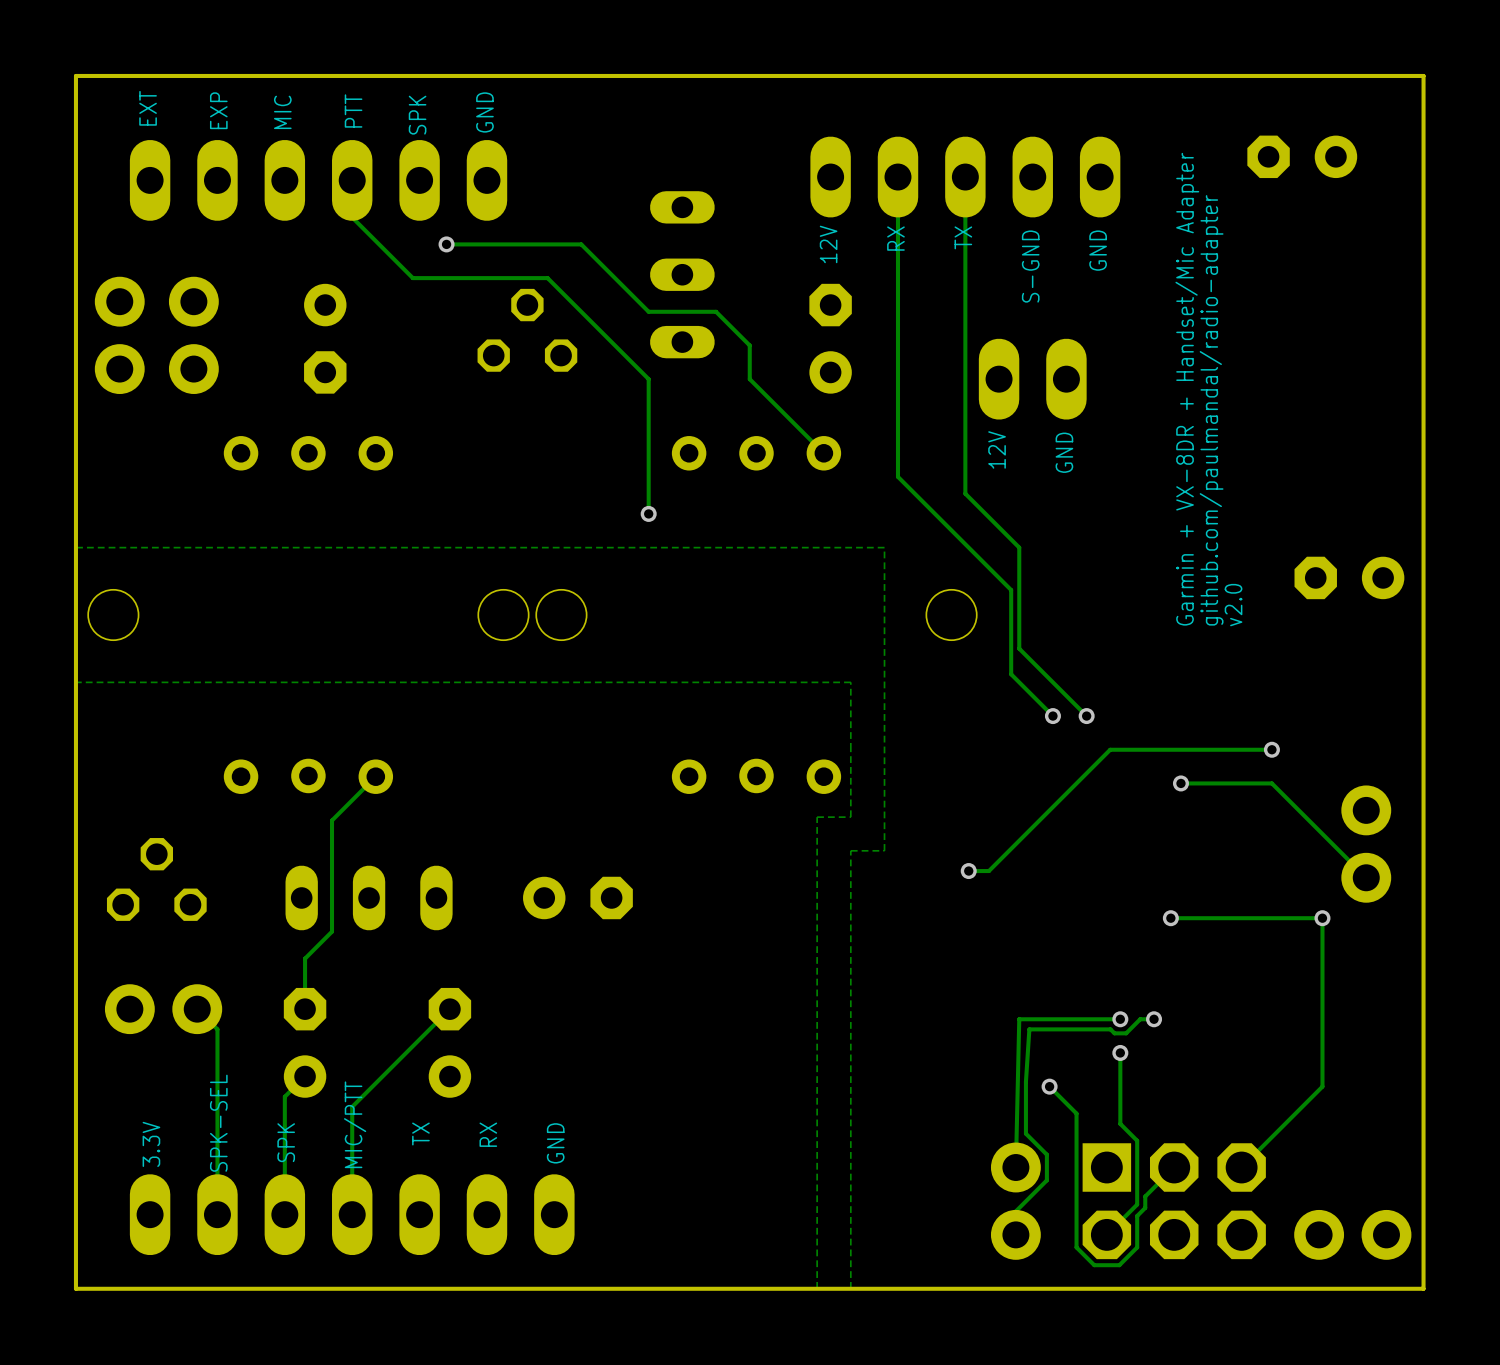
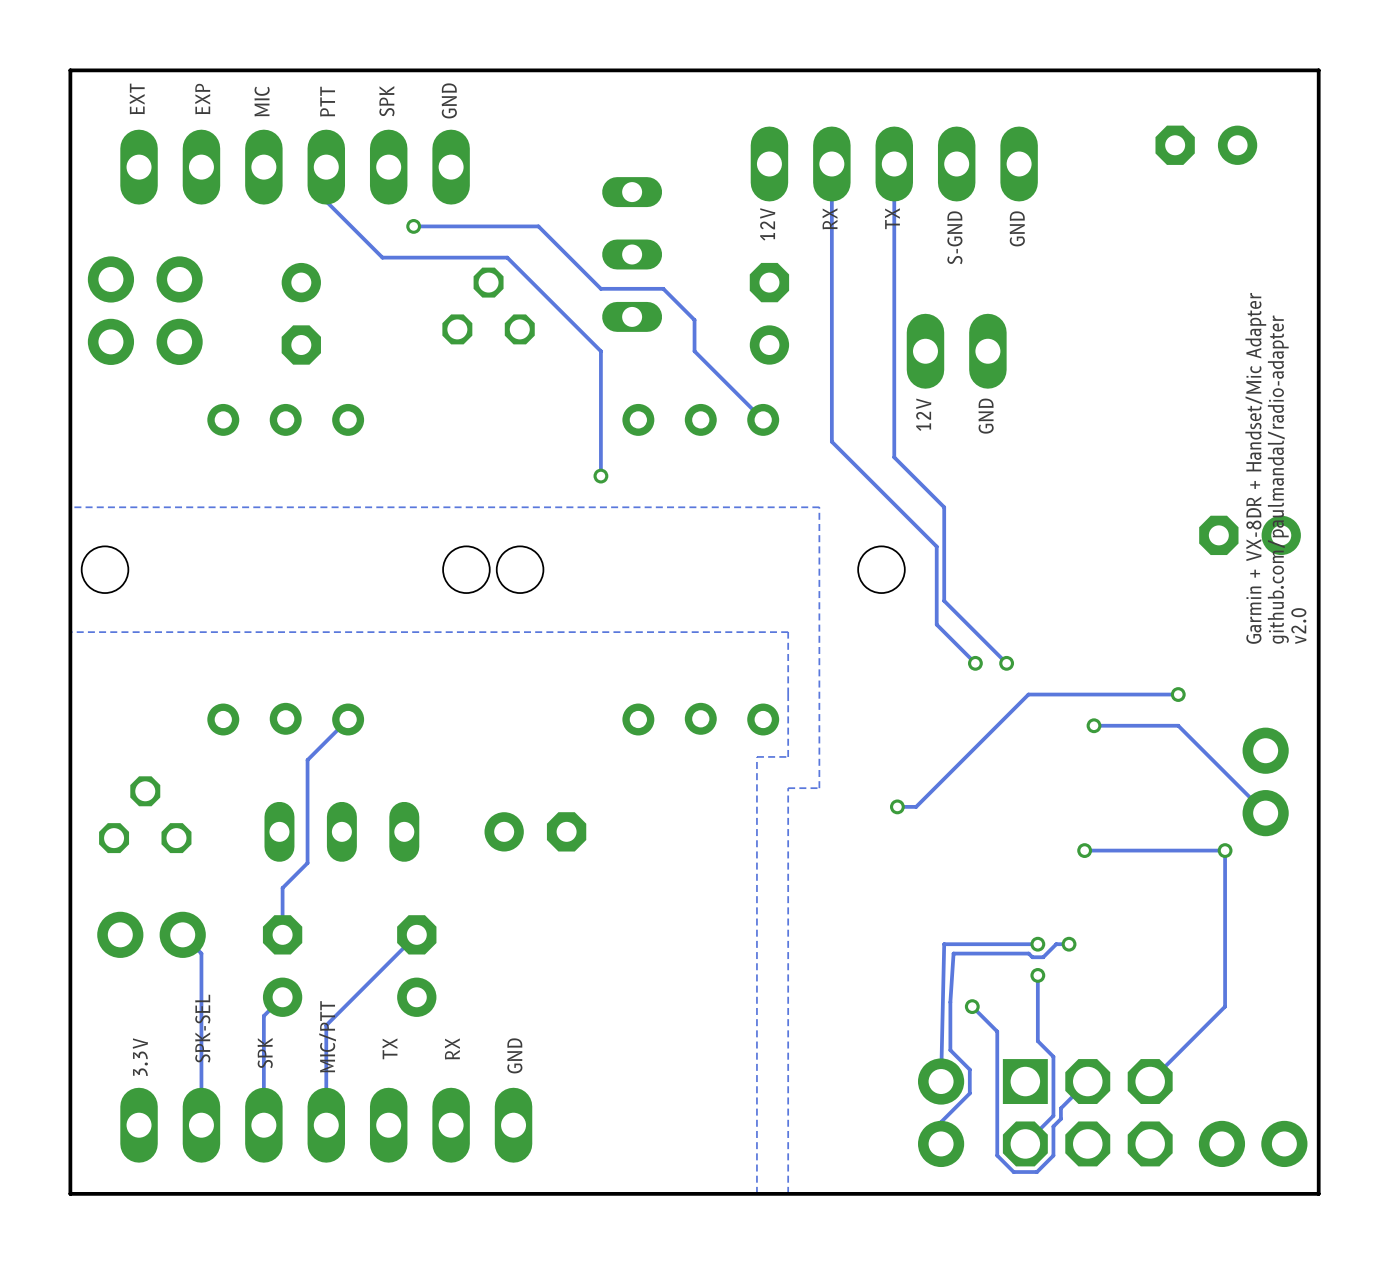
text position: Garmin + VX-8DR + Handset/Mic Adapter (1187, 389) -> Garmin + VX-8DR + Handset/Mic Adapter (1255, 468)
text position: github.com/paulmandal/radio-adapter (1211, 410) -> github.com/paulmandal/radio-adapter (1278, 479)
text position: v2.0 (1233, 605) -> v2.0 (1298, 626)

